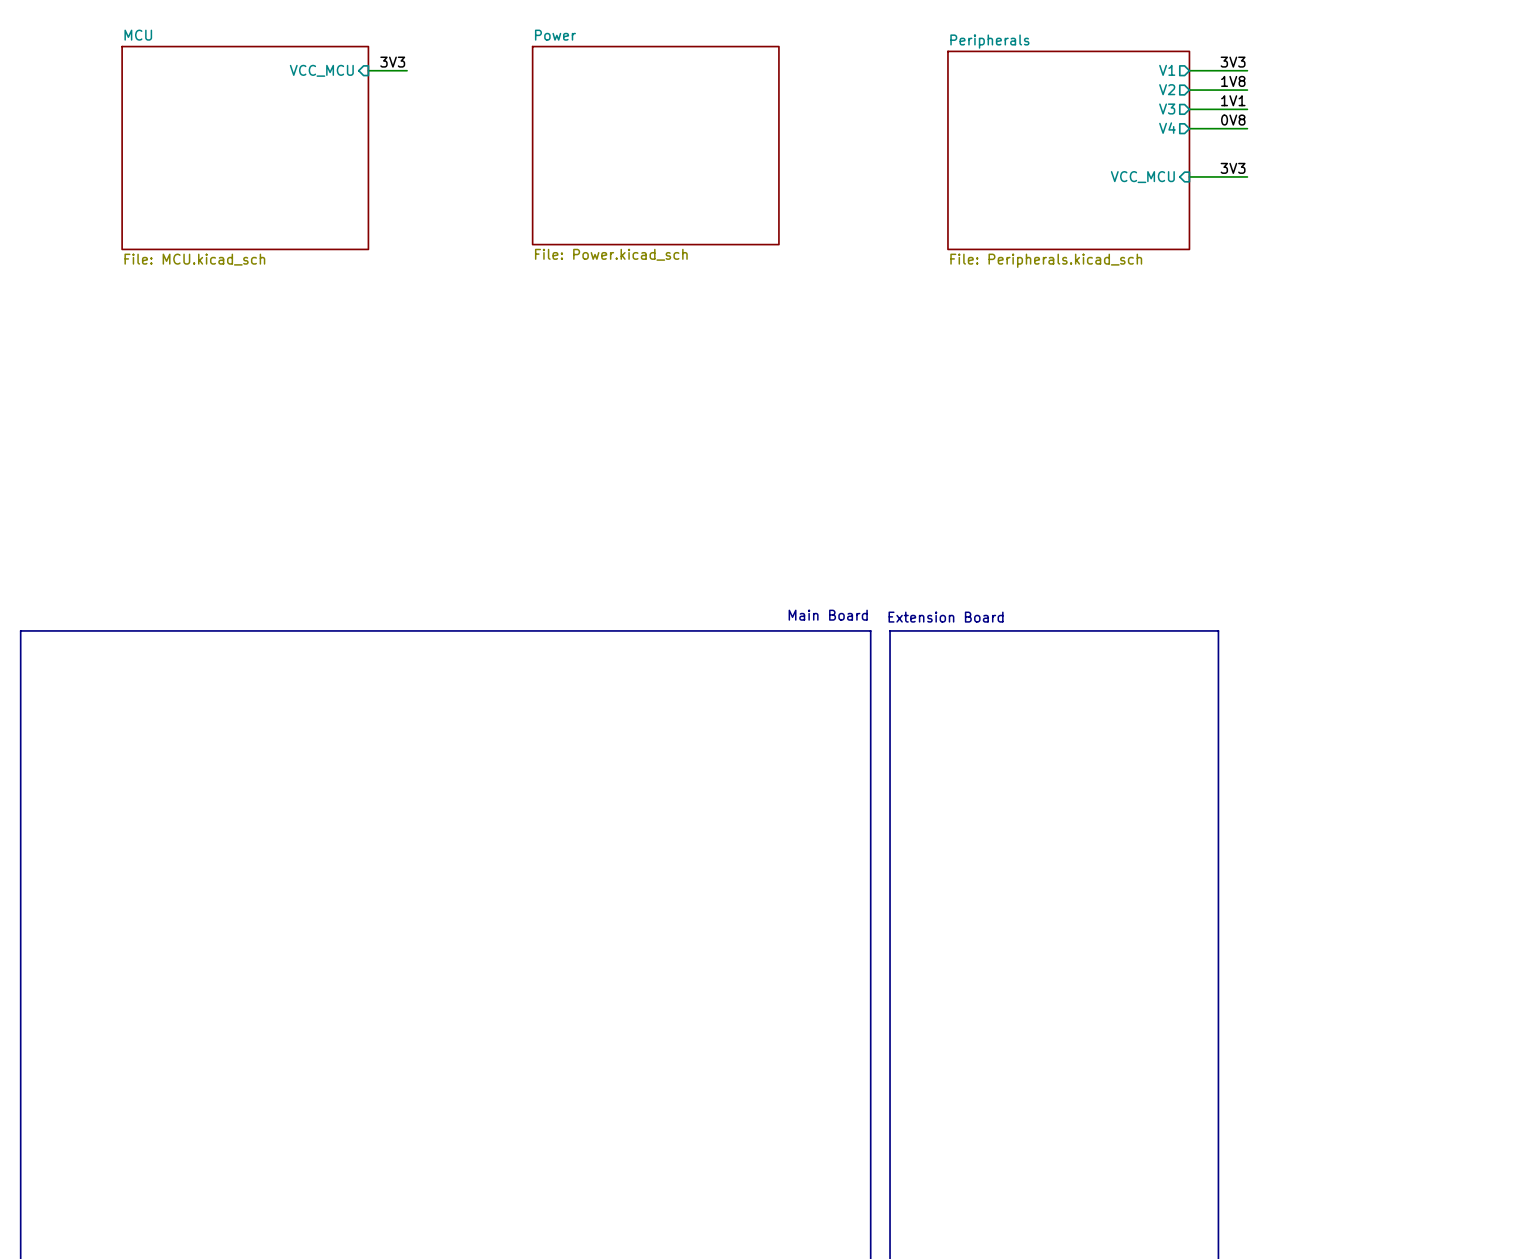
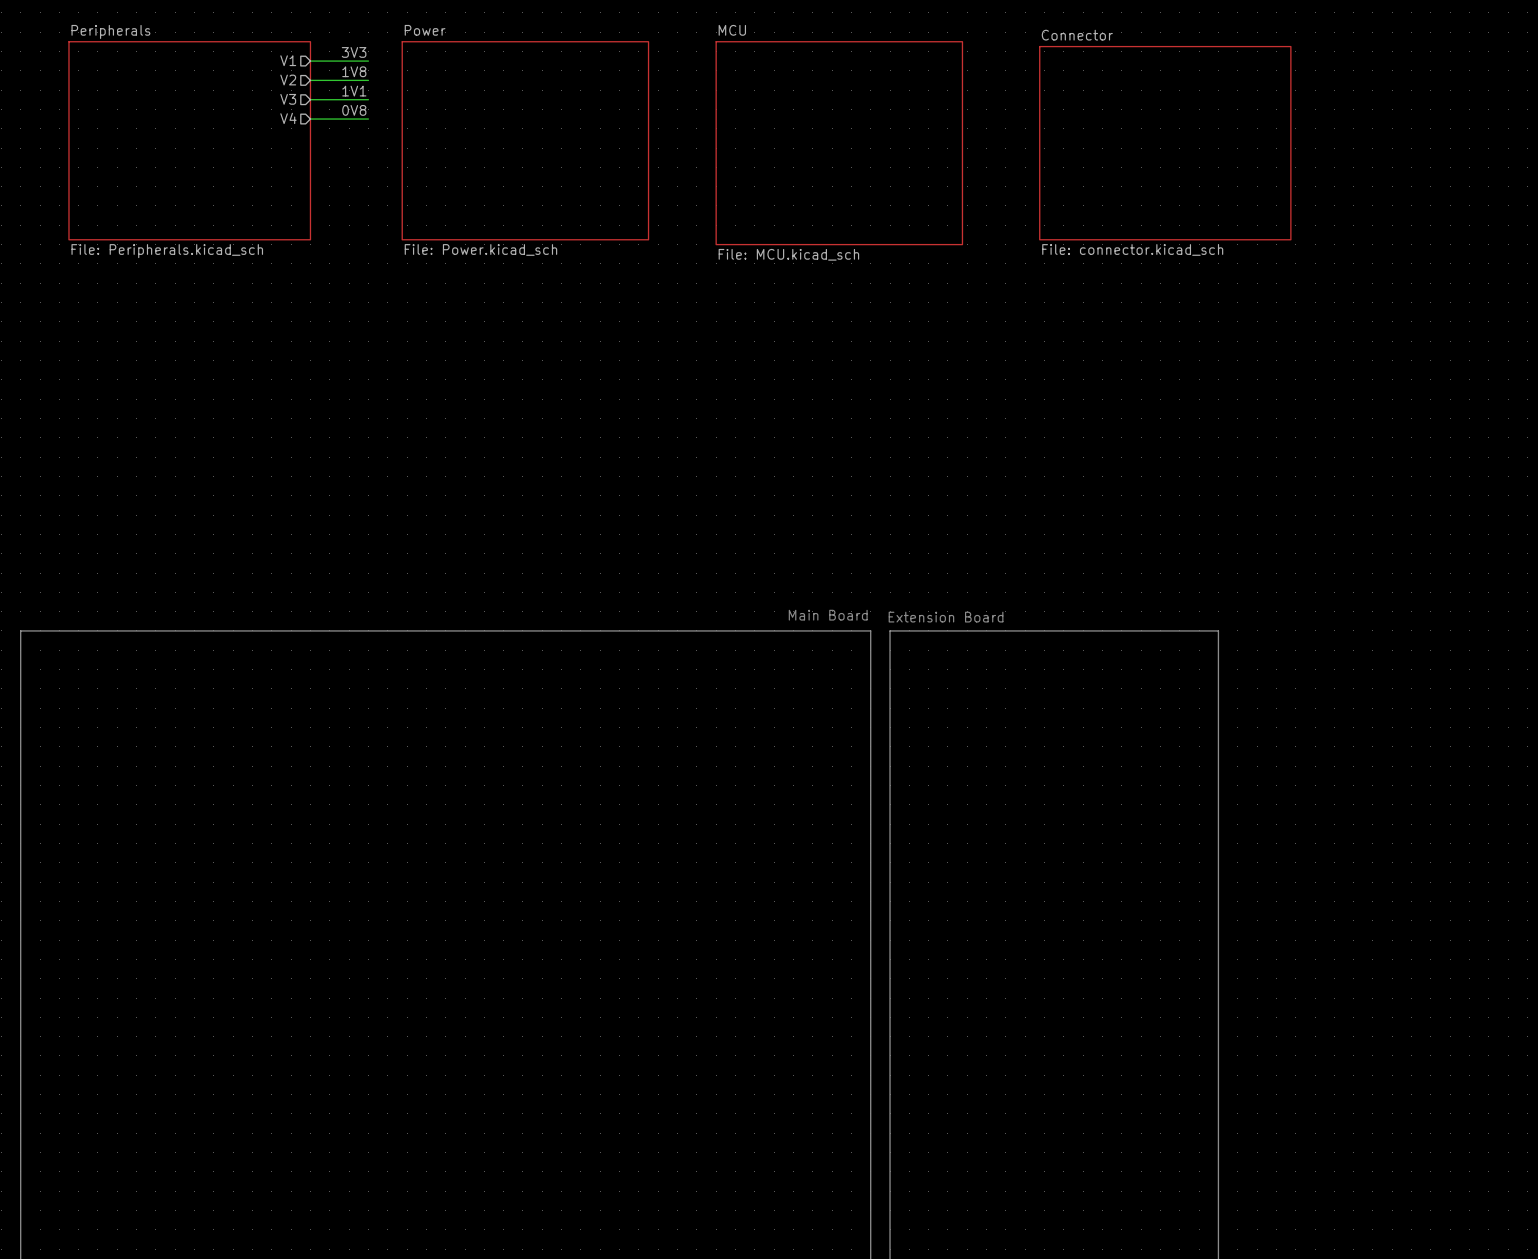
sheet pin: none -> V1 (288, 60)
wire: none -> (310, 61) (368, 61)
label position: 3V3 (392, 62) -> 3V3 (354, 52)
label: 3V3 (1233, 62) -> none
sheet pin: VCC_MCU (321, 70) -> none
wire: (368, 70) (407, 70) -> none
sheet pin: V1 (1167, 70) -> none
wire: (1189, 70) (1247, 70) -> none
label: none -> 1V8 (354, 71)
sheet pin: none -> V2 (288, 80)
wire: none -> (310, 80) (368, 80)
label: 1V8 (1233, 81) -> none
sheet pin: V2 (1167, 89) -> none
wire: (1189, 90) (1247, 90) -> none
label: none -> 1V1 (354, 91)
sheet pin: none -> V3 (288, 99)
wire: none -> (310, 99) (368, 99)
label: 1V1 (1233, 100) -> none
sheet pin: V3 (1167, 109) -> none
wire: (1189, 109) (1247, 109) -> none
label: none -> 0V8 (354, 110)
sheet pin: none -> V4 (288, 118)
wire: none -> (310, 119) (368, 119)
label: 0V8 (1233, 120) -> none
sheet pin: V4 (1167, 128) -> none
wire: (1189, 128) (1247, 128) -> none
sheet Peripherals: none -> File: Peripherals.kicad_sch (189, 140)
sheet MCU: none -> File: MCU.kicad_sch (839, 143)
sheet Connector: none -> File: connector.kicad_sch (1165, 143)
sheet Power position: (655, 145) -> (525, 140)
sheet MCU: File: MCU.kicad_sch (245, 148) -> none
sheet Peripherals: File: Peripherals.kicad_sch (1068, 150) -> none
label: 3V3 (1233, 168) -> none
wire: (1189, 176) (1247, 176) -> none
sheet pin: VCC_MCU (1142, 177) -> none

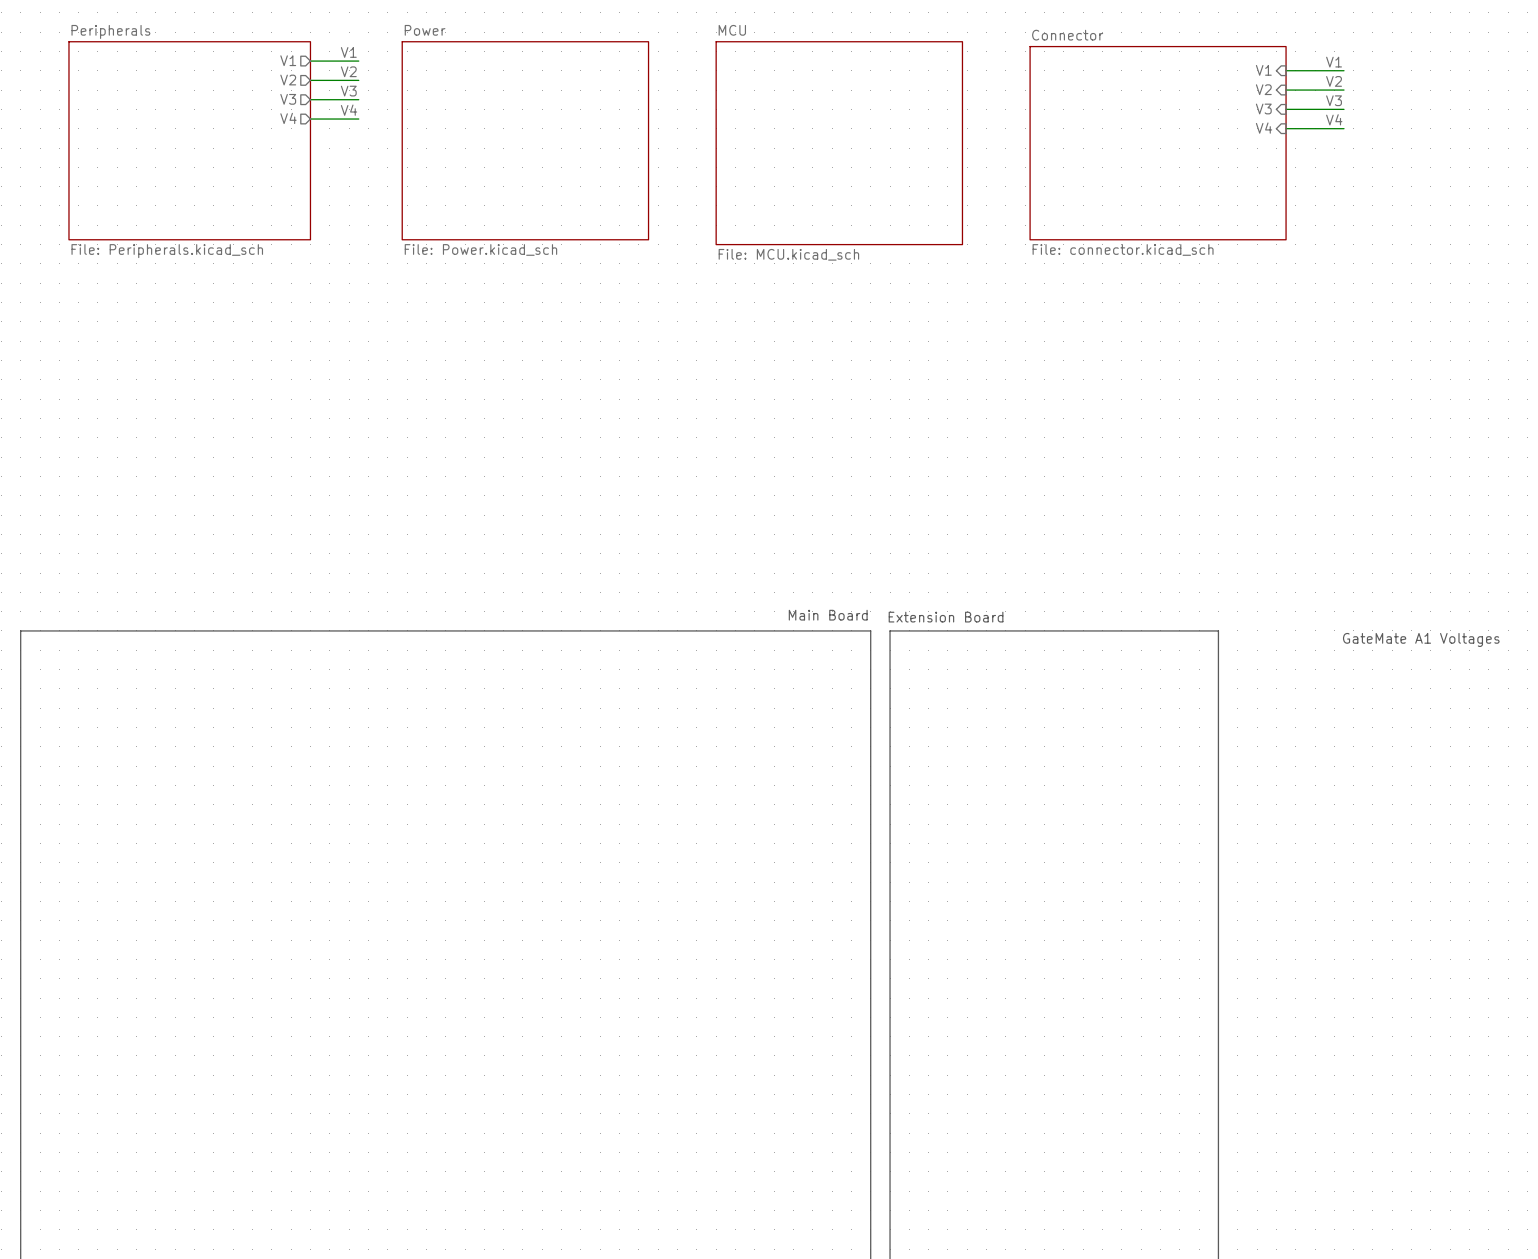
sheet Connector shape: [1039, 46, 1292, 241] -> [1029, 46, 1287, 241]
label: none -> V1 (348, 52)
label: 3V3 (354, 52) -> none
wire: (358, 61) (368, 61) -> none
label: none -> V1 (1334, 62)
sheet pin: none -> V1 (1263, 70)
wire: none -> (1286, 70) (1344, 70)
label: none -> V2 (348, 71)
label: 1V8 (354, 71) -> none
wire: (358, 80) (368, 80) -> none
label: none -> V2 (1334, 81)
sheet pin: none -> V2 (1263, 89)
wire: none -> (1286, 90) (1344, 90)
label: none -> V3 (348, 91)
label: 1V1 (354, 91) -> none
wire: (358, 99) (368, 99) -> none
label: none -> V3 (1334, 100)
sheet pin: none -> V3 (1263, 109)
wire: none -> (1286, 109) (1344, 109)
label: none -> V4 (349, 110)
label: 0V8 (354, 110) -> none
wire: (358, 119) (368, 119) -> none
label: none -> V4 (1334, 119)
sheet pin: none -> V4 (1264, 128)
wire: none -> (1286, 128) (1344, 128)
text: none -> GateMate A1 Voltages (1421, 639)

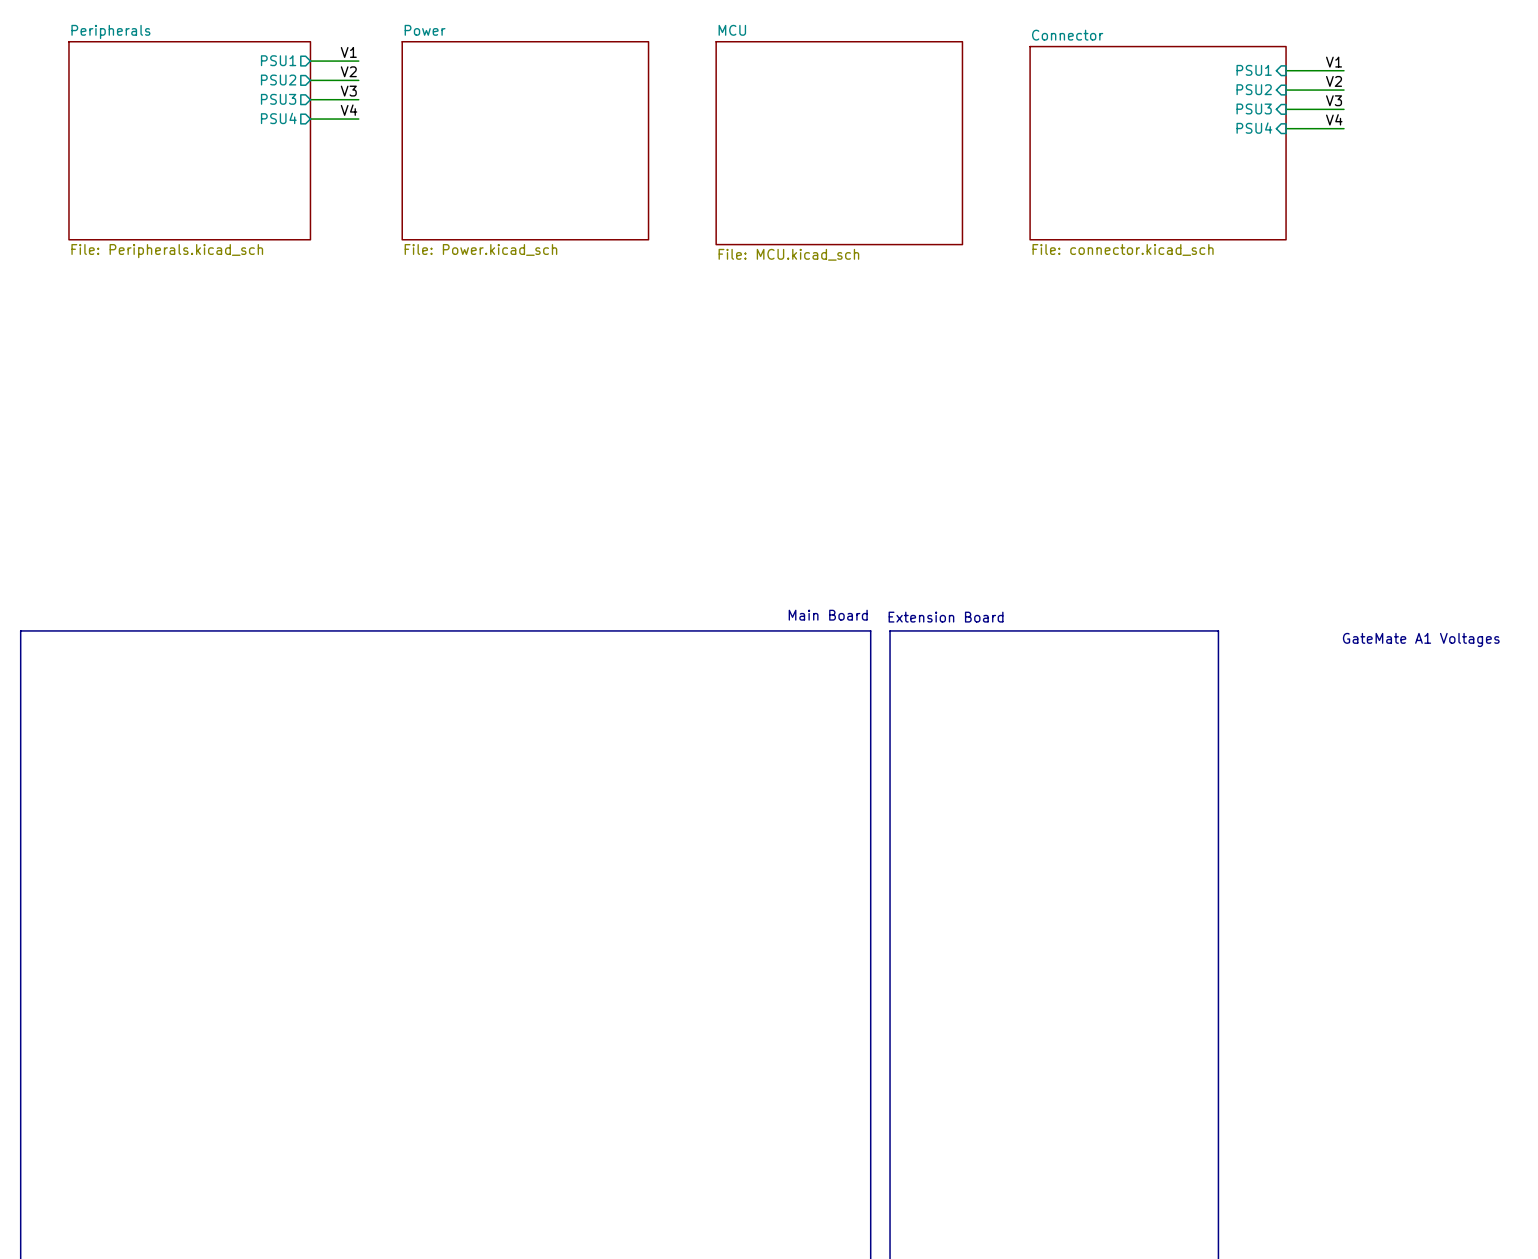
sheet pin: V1 (288, 60) -> PSU1 (278, 60)
sheet pin: V1 (1263, 70) -> PSU1 (1254, 70)
sheet pin: V2 (288, 80) -> PSU2 (278, 80)
sheet pin: V2 (1263, 89) -> PSU2 (1254, 89)
sheet pin: V3 (288, 99) -> PSU3 (278, 99)
sheet pin: V3 (1263, 109) -> PSU3 (1254, 109)
sheet pin: V4 (288, 118) -> PSU4 (278, 118)
sheet pin: V4 (1264, 128) -> PSU4 (1254, 128)

